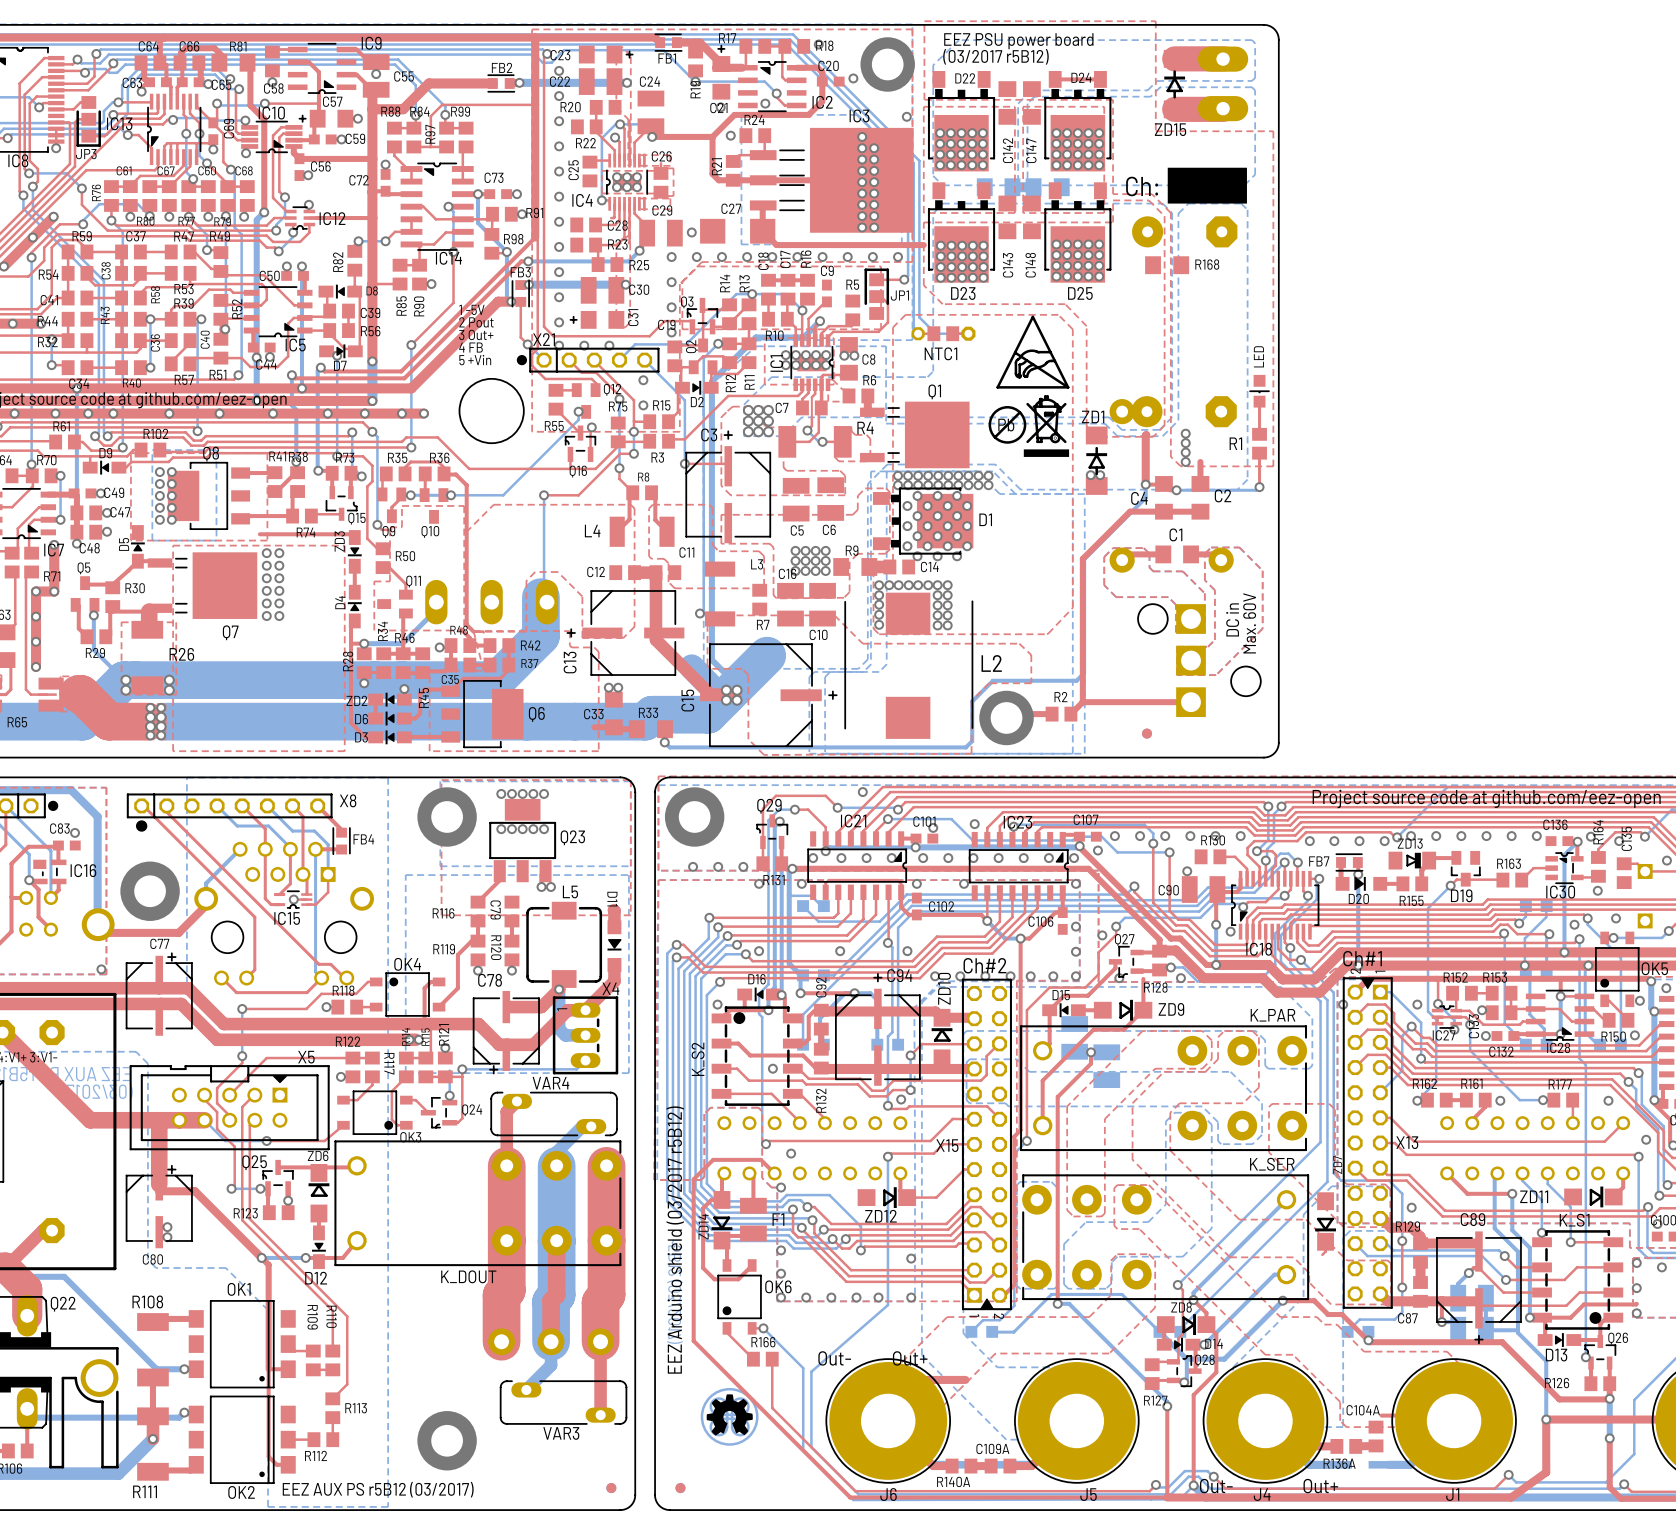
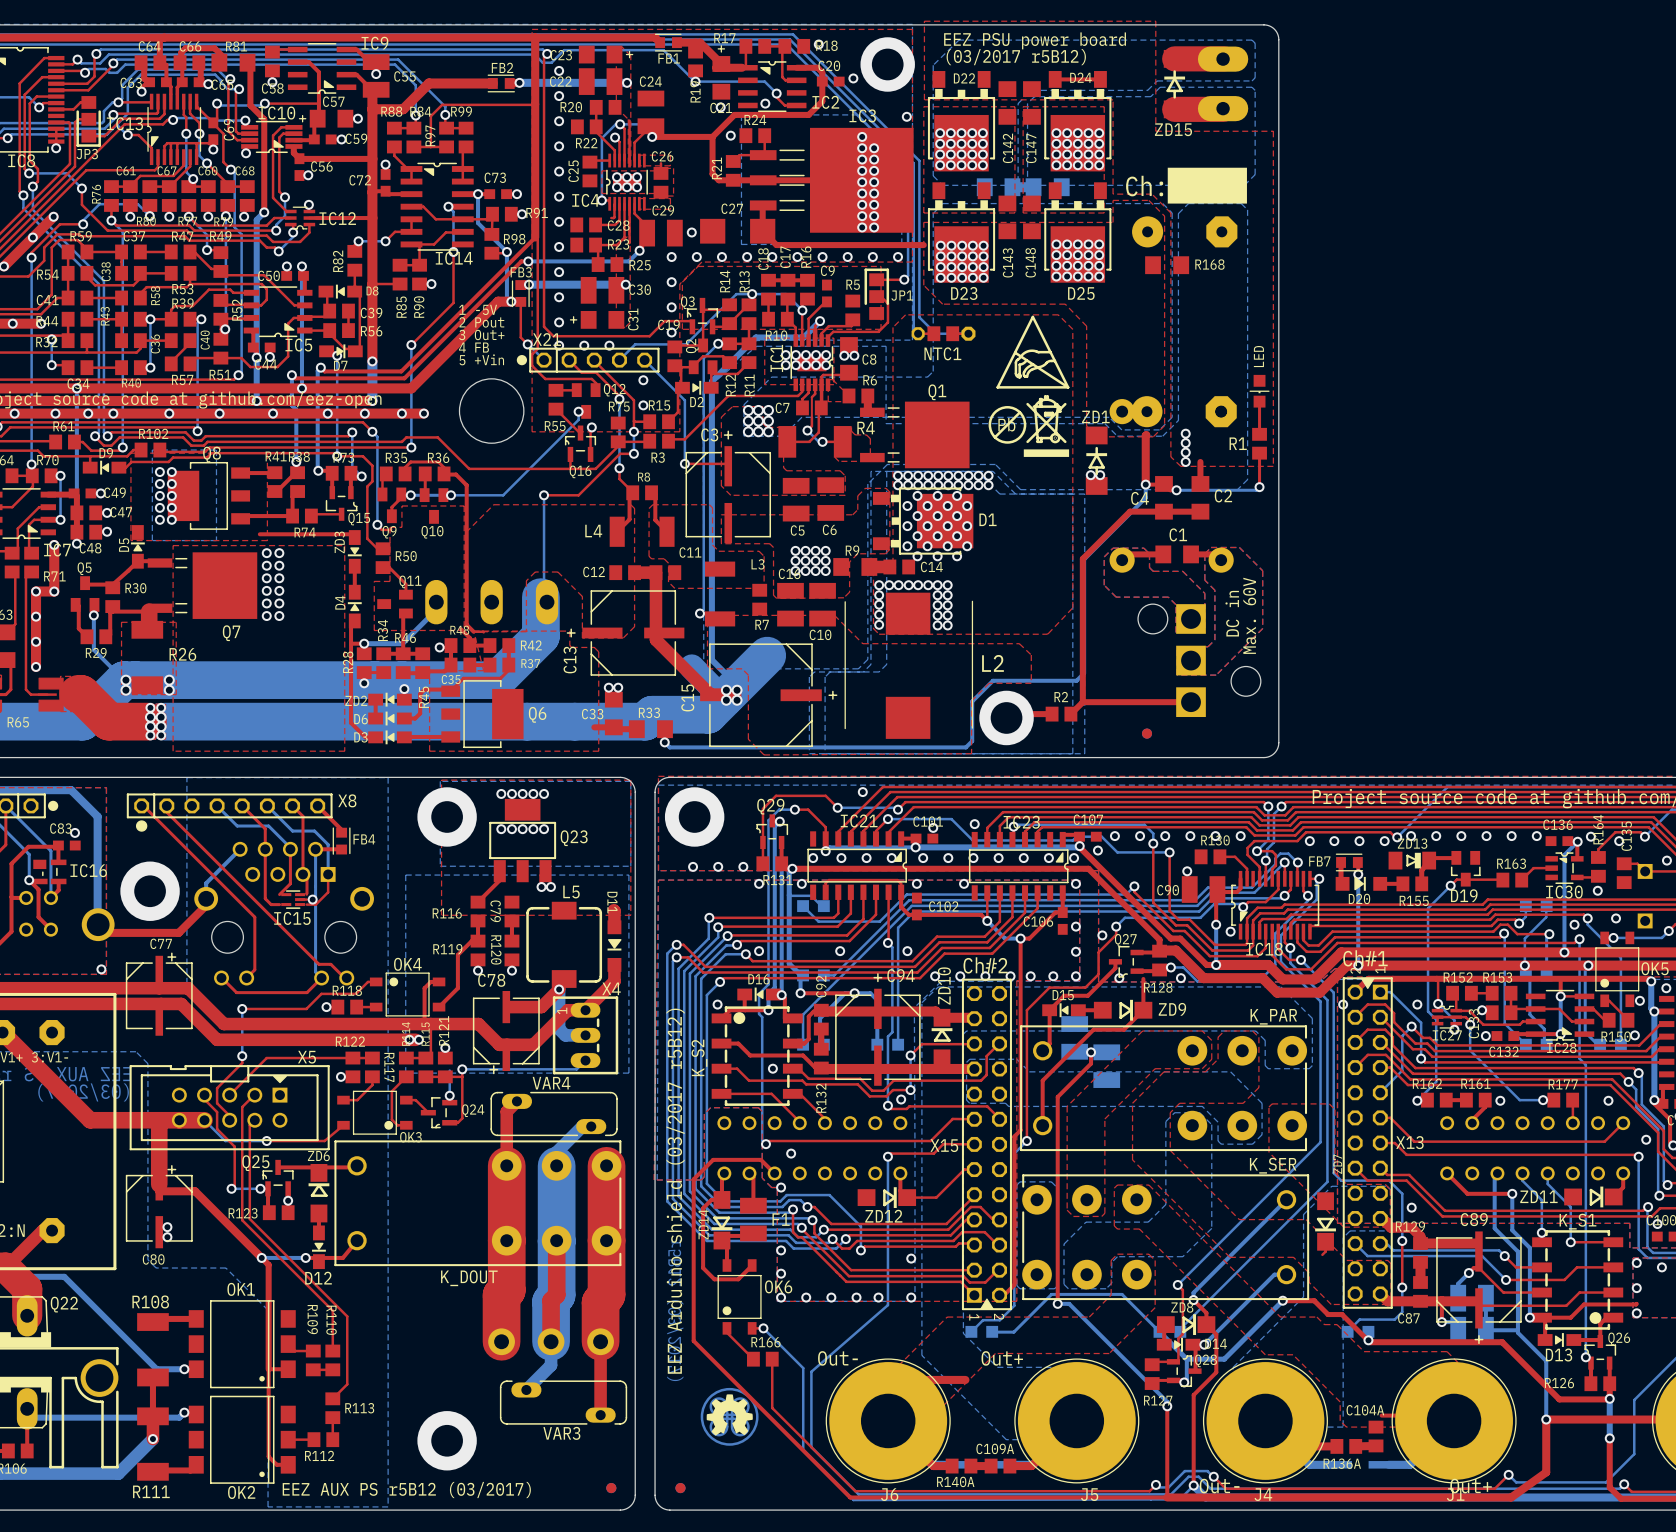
IC15 footprint: [274, 890, 313, 909] -> [281, 890, 306, 909]
via position: (293, 899) -> (312, 899)

